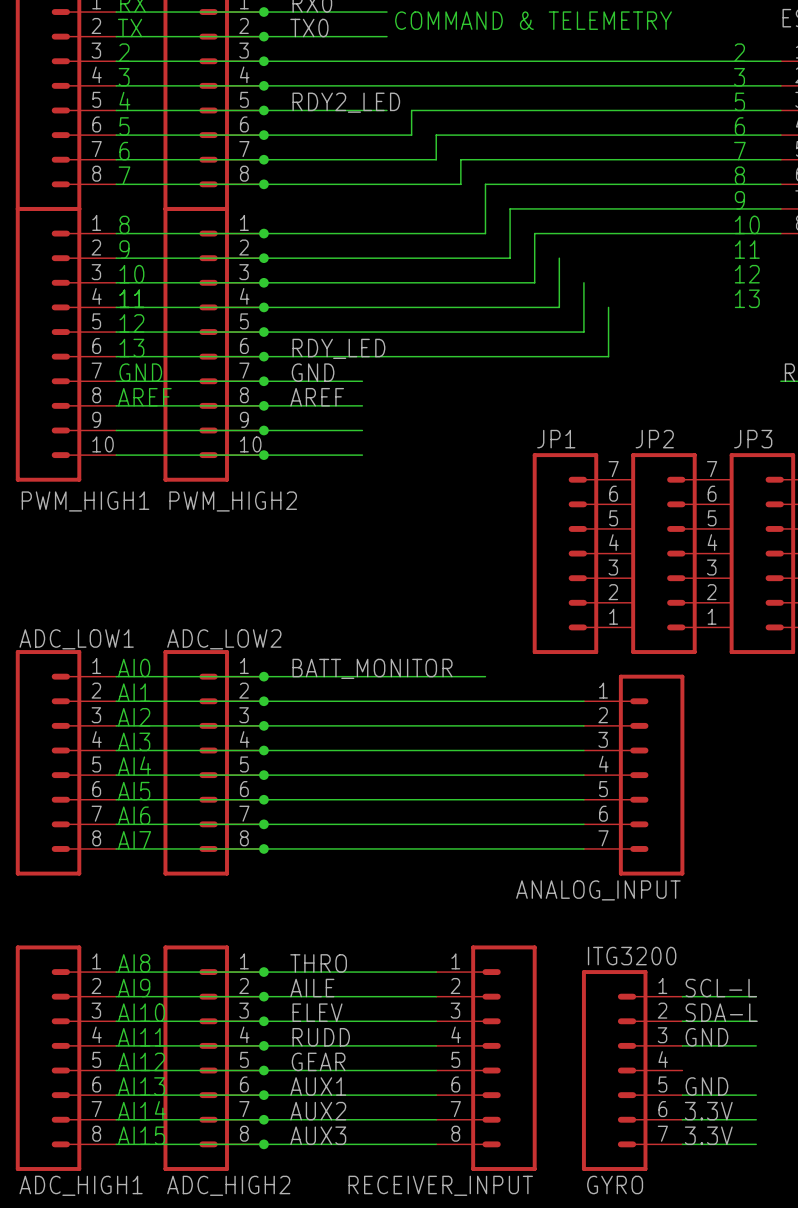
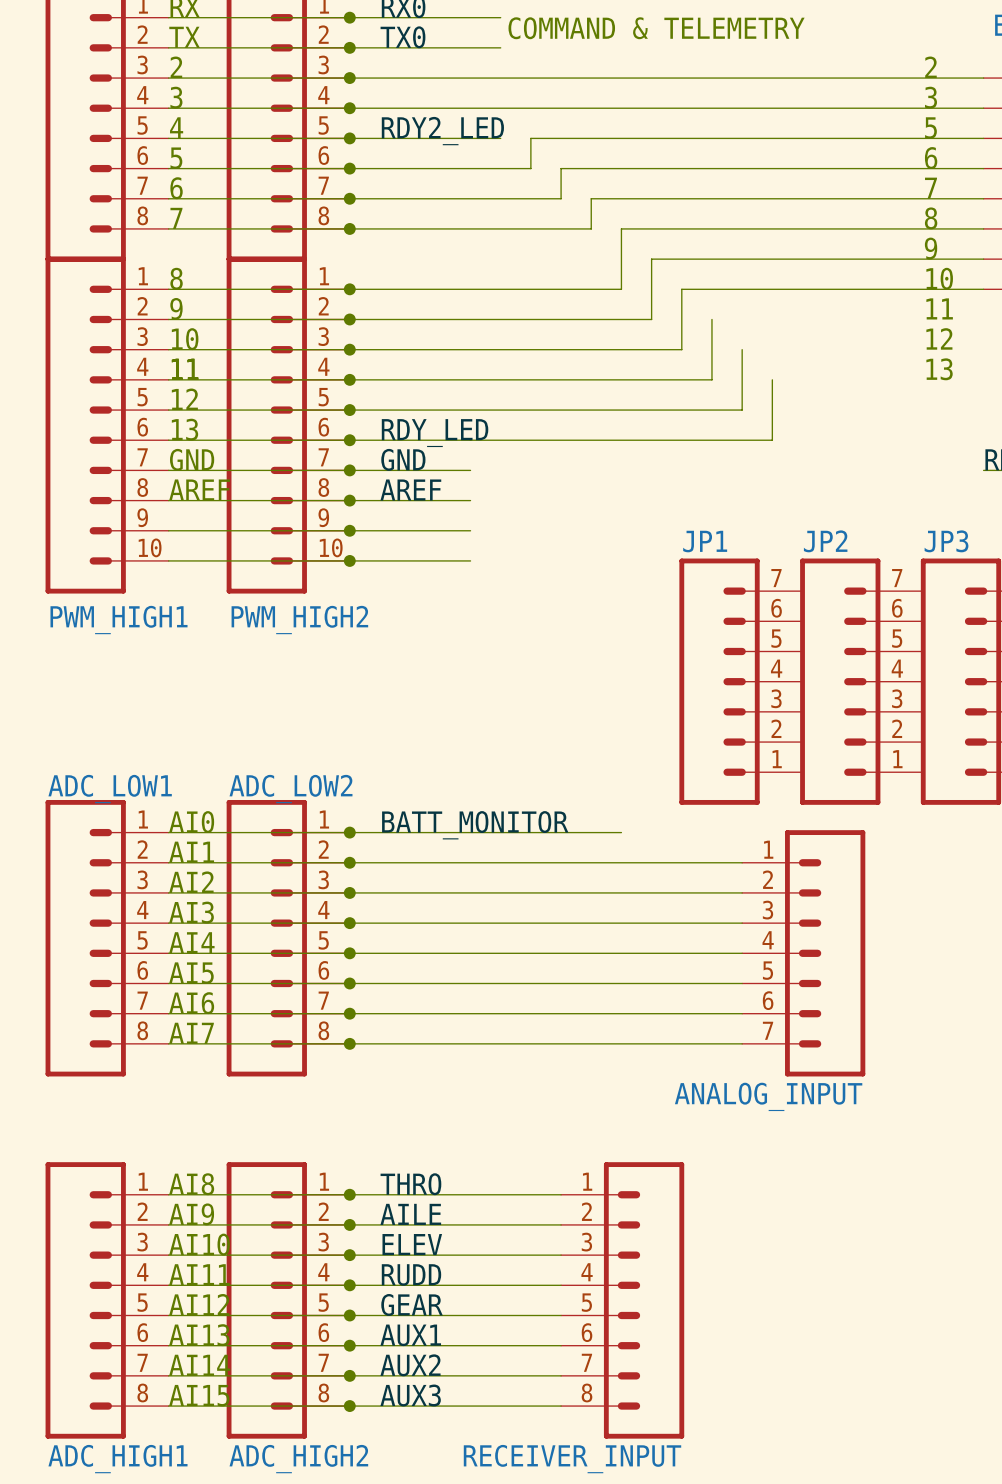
label: SCL-L (721, 988) -> none
wire: (682, 996) (756, 996) -> none
label: SDA-L (721, 1012) -> none
wire: (682, 1021) (756, 1021) -> none
label: GND (706, 1037) -> none
wire: (682, 1045) (756, 1045) -> none
GYRO: ITG3200 (632, 1070) -> none
label: GND (706, 1086) -> none
wire: (682, 1095) (756, 1095) -> none
label: 3.3V (708, 1111) -> none
wire: (682, 1119) (756, 1119) -> none
label: 3.3V (708, 1135) -> none
wire: (682, 1144) (756, 1144) -> none

